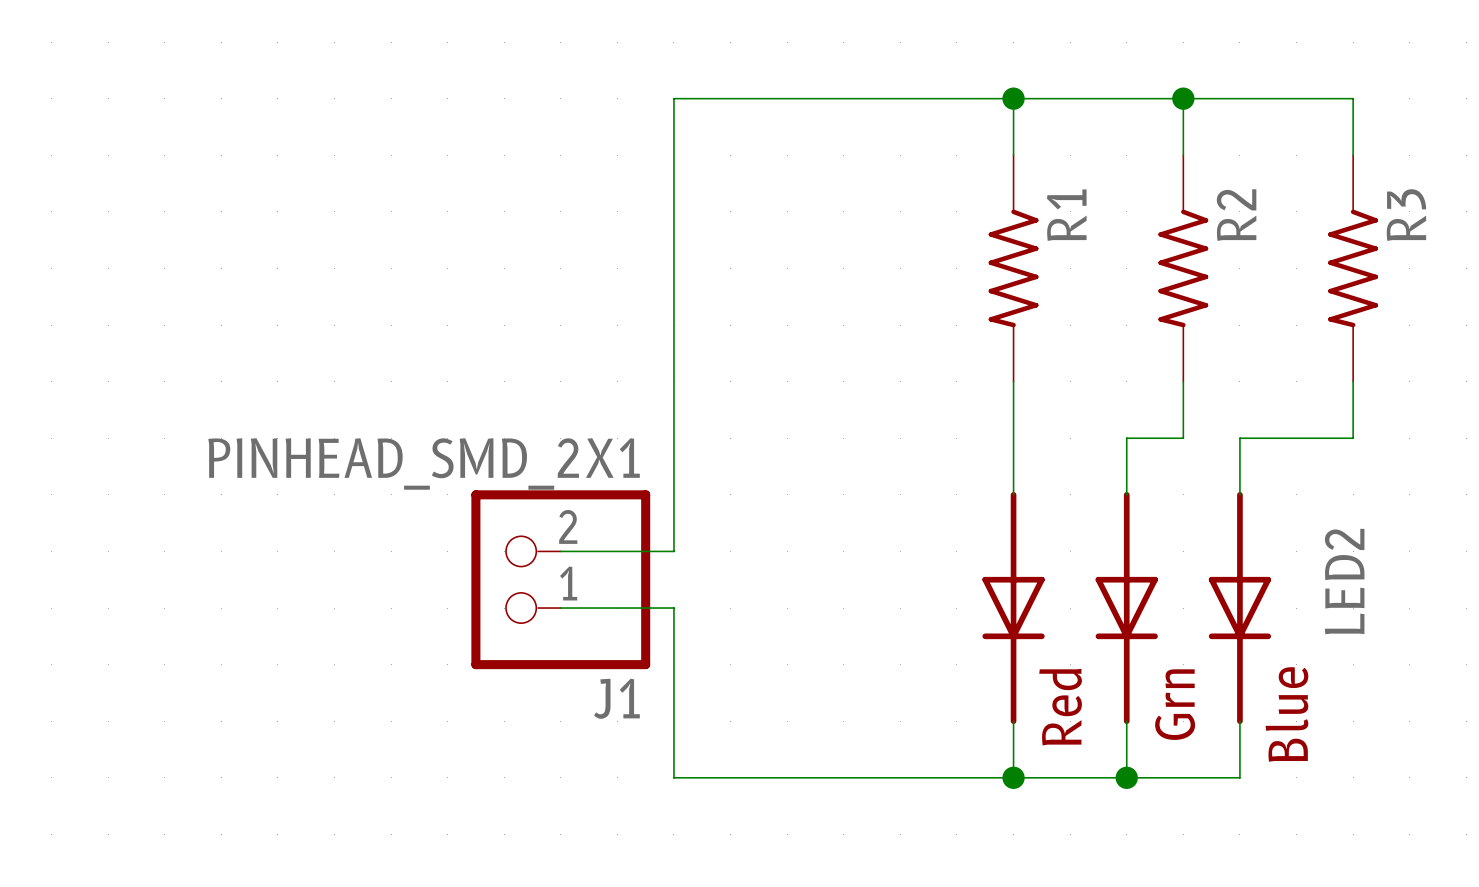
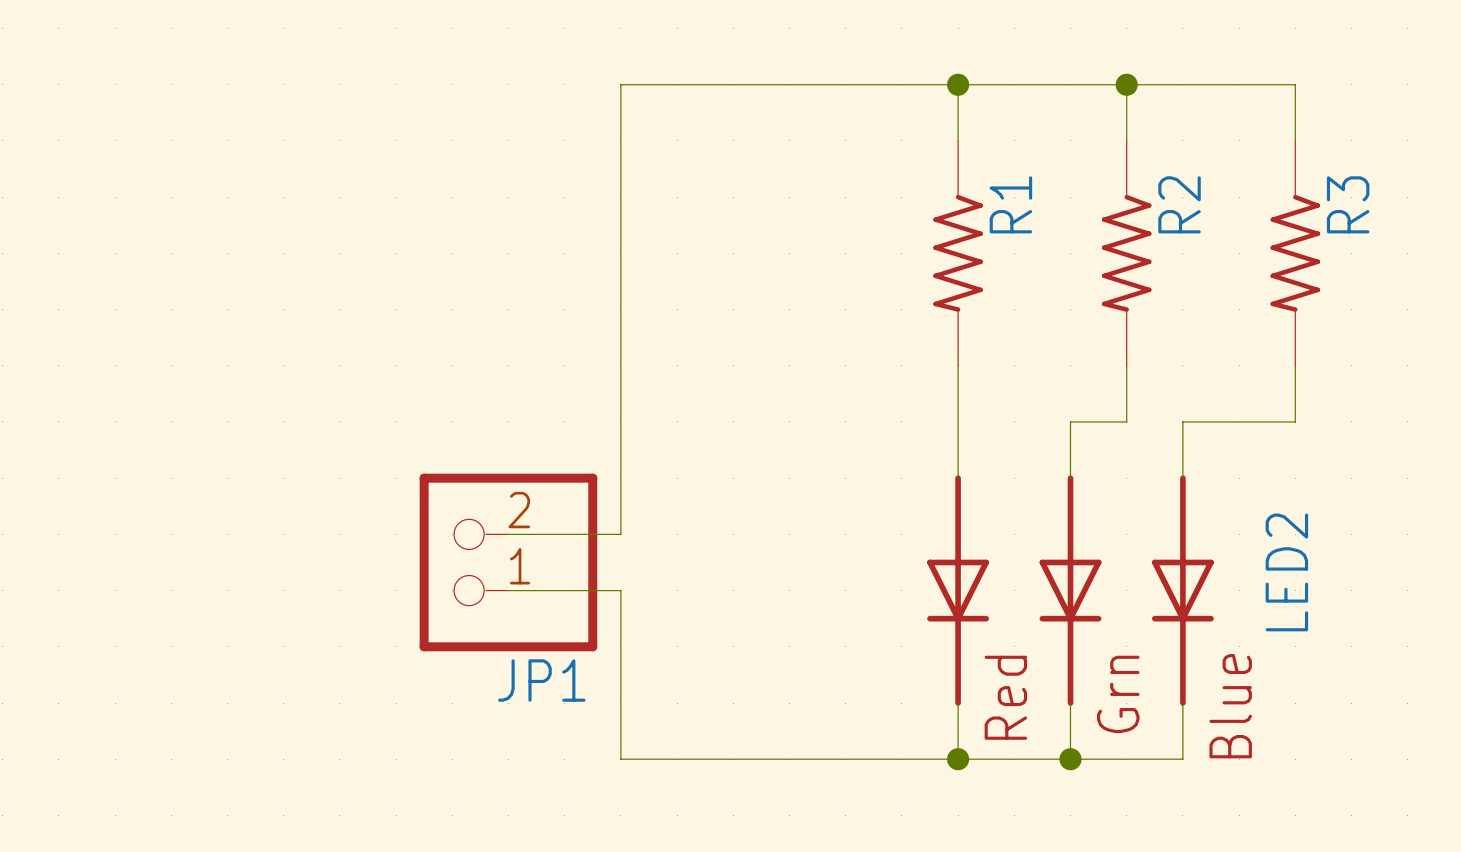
J1 value: PINHEAD_SMD_2X1 (424, 463) -> none
J1 name: J1 (616, 698) -> JP1 (541, 680)

